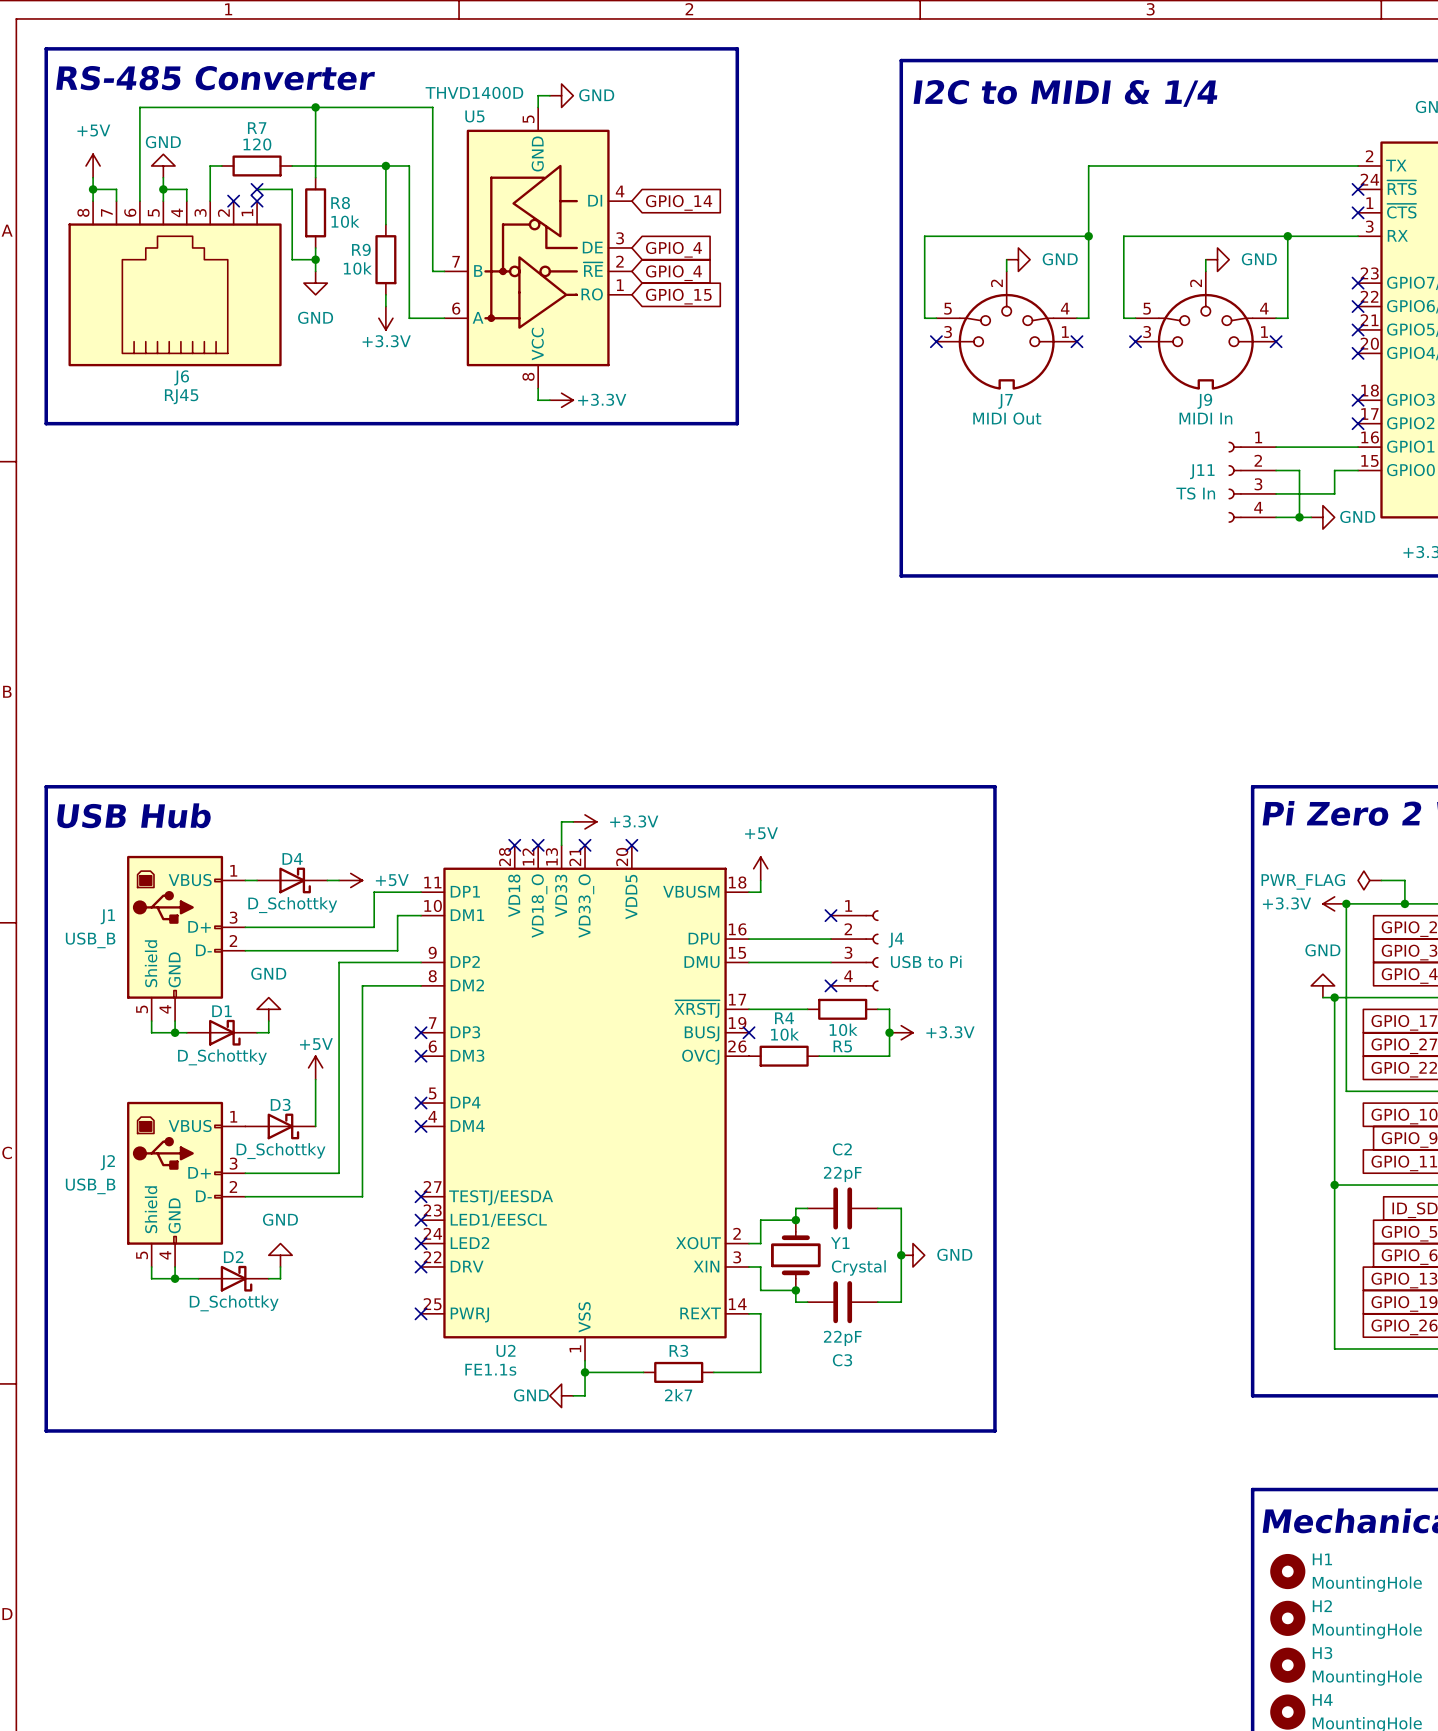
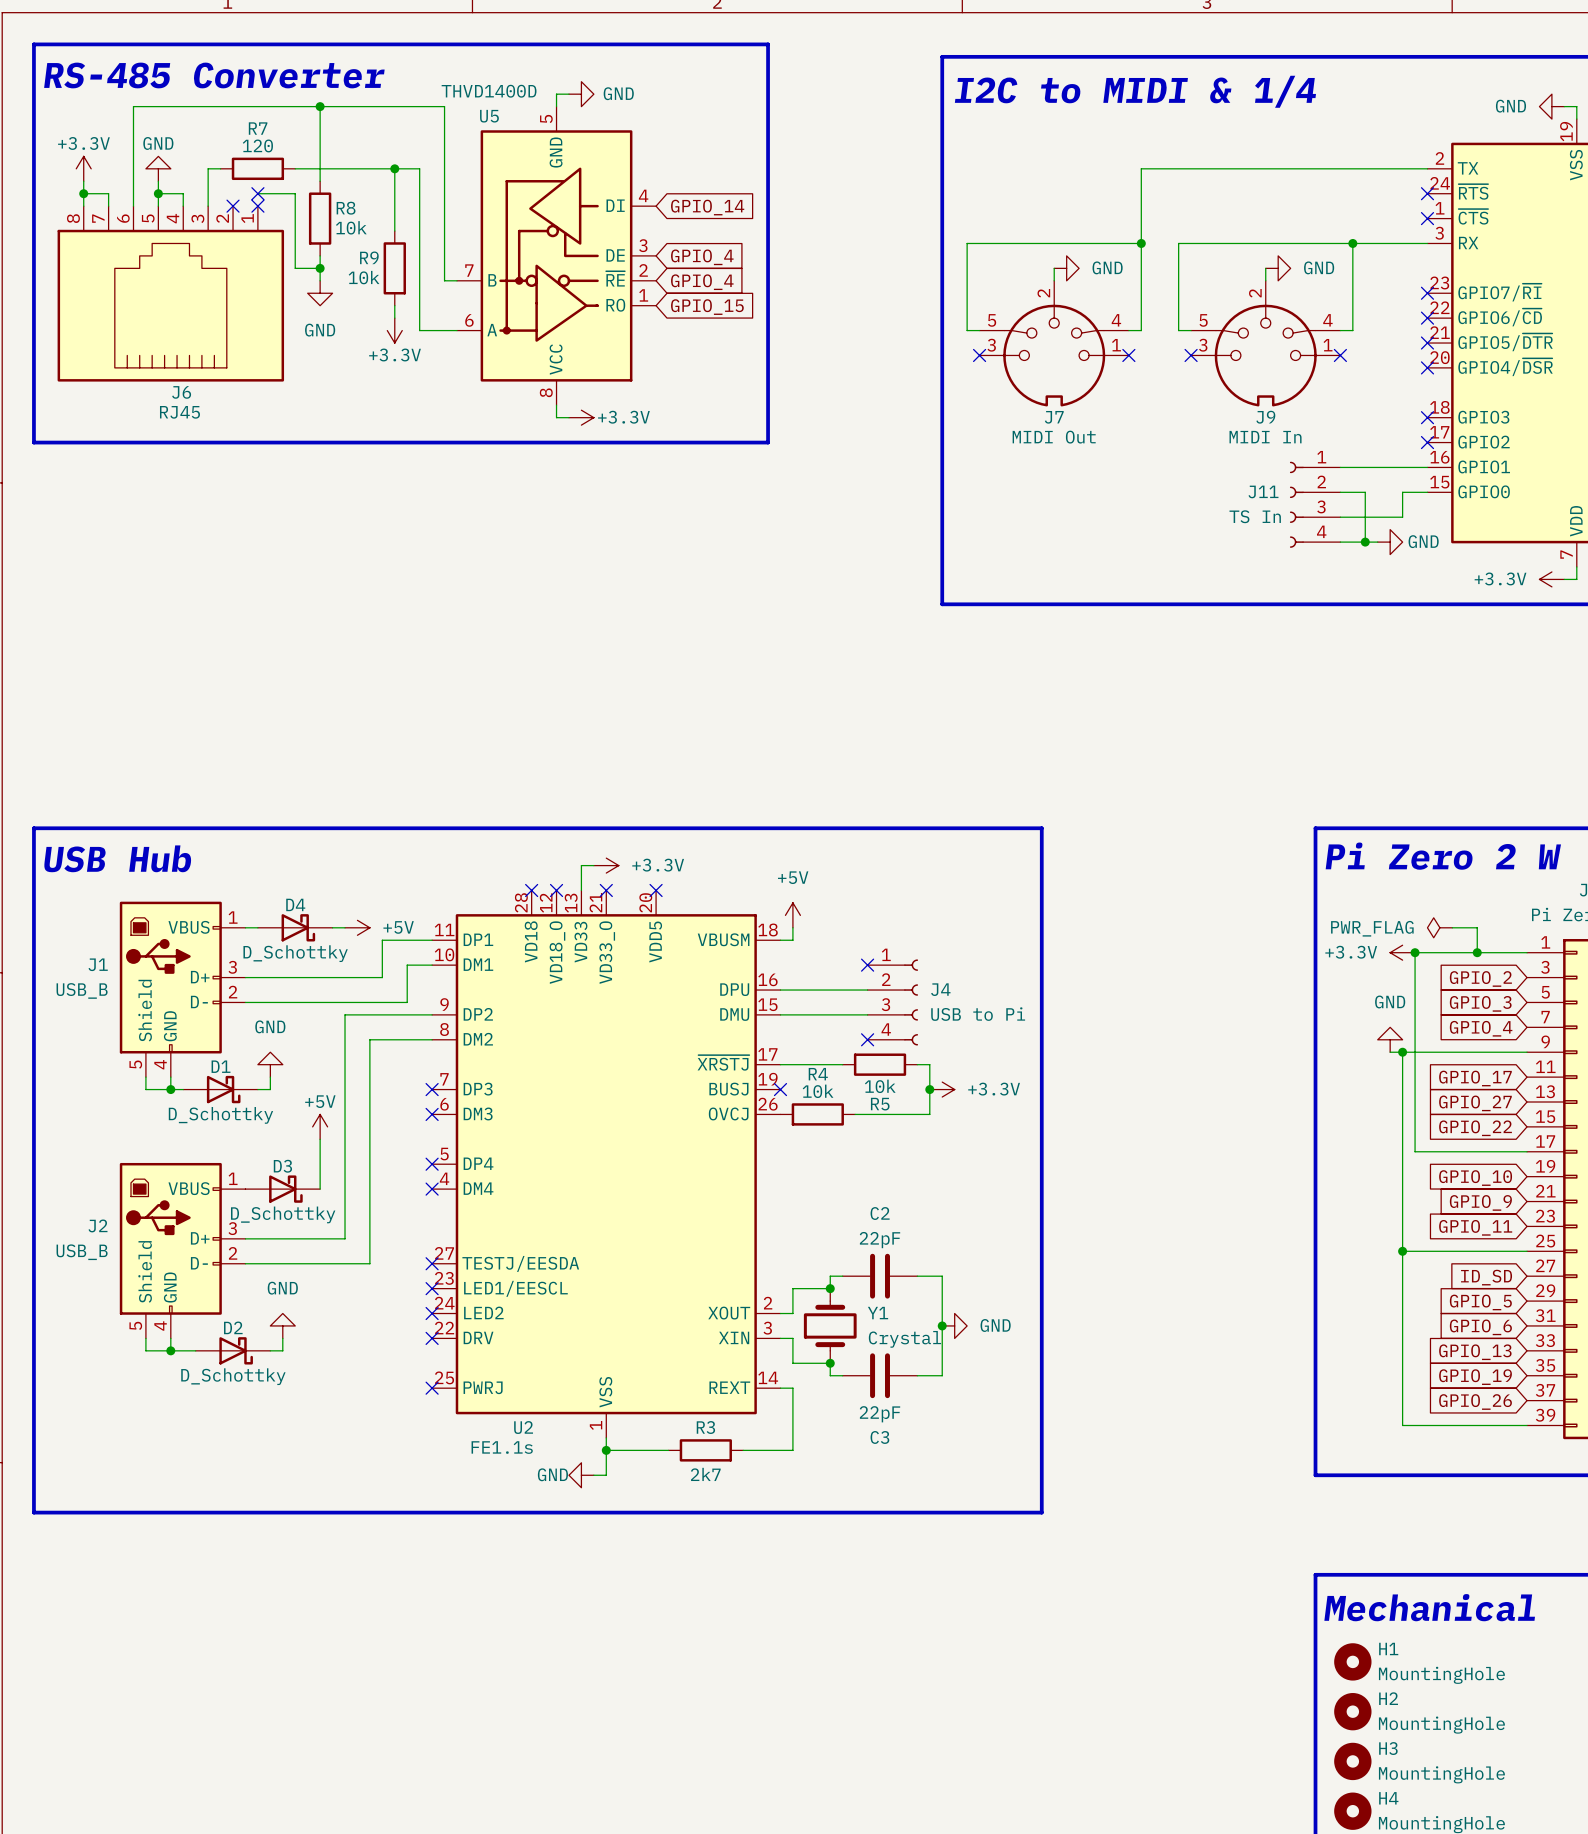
power symbol: +5V (93, 165) -> +3.3V (83, 168)

